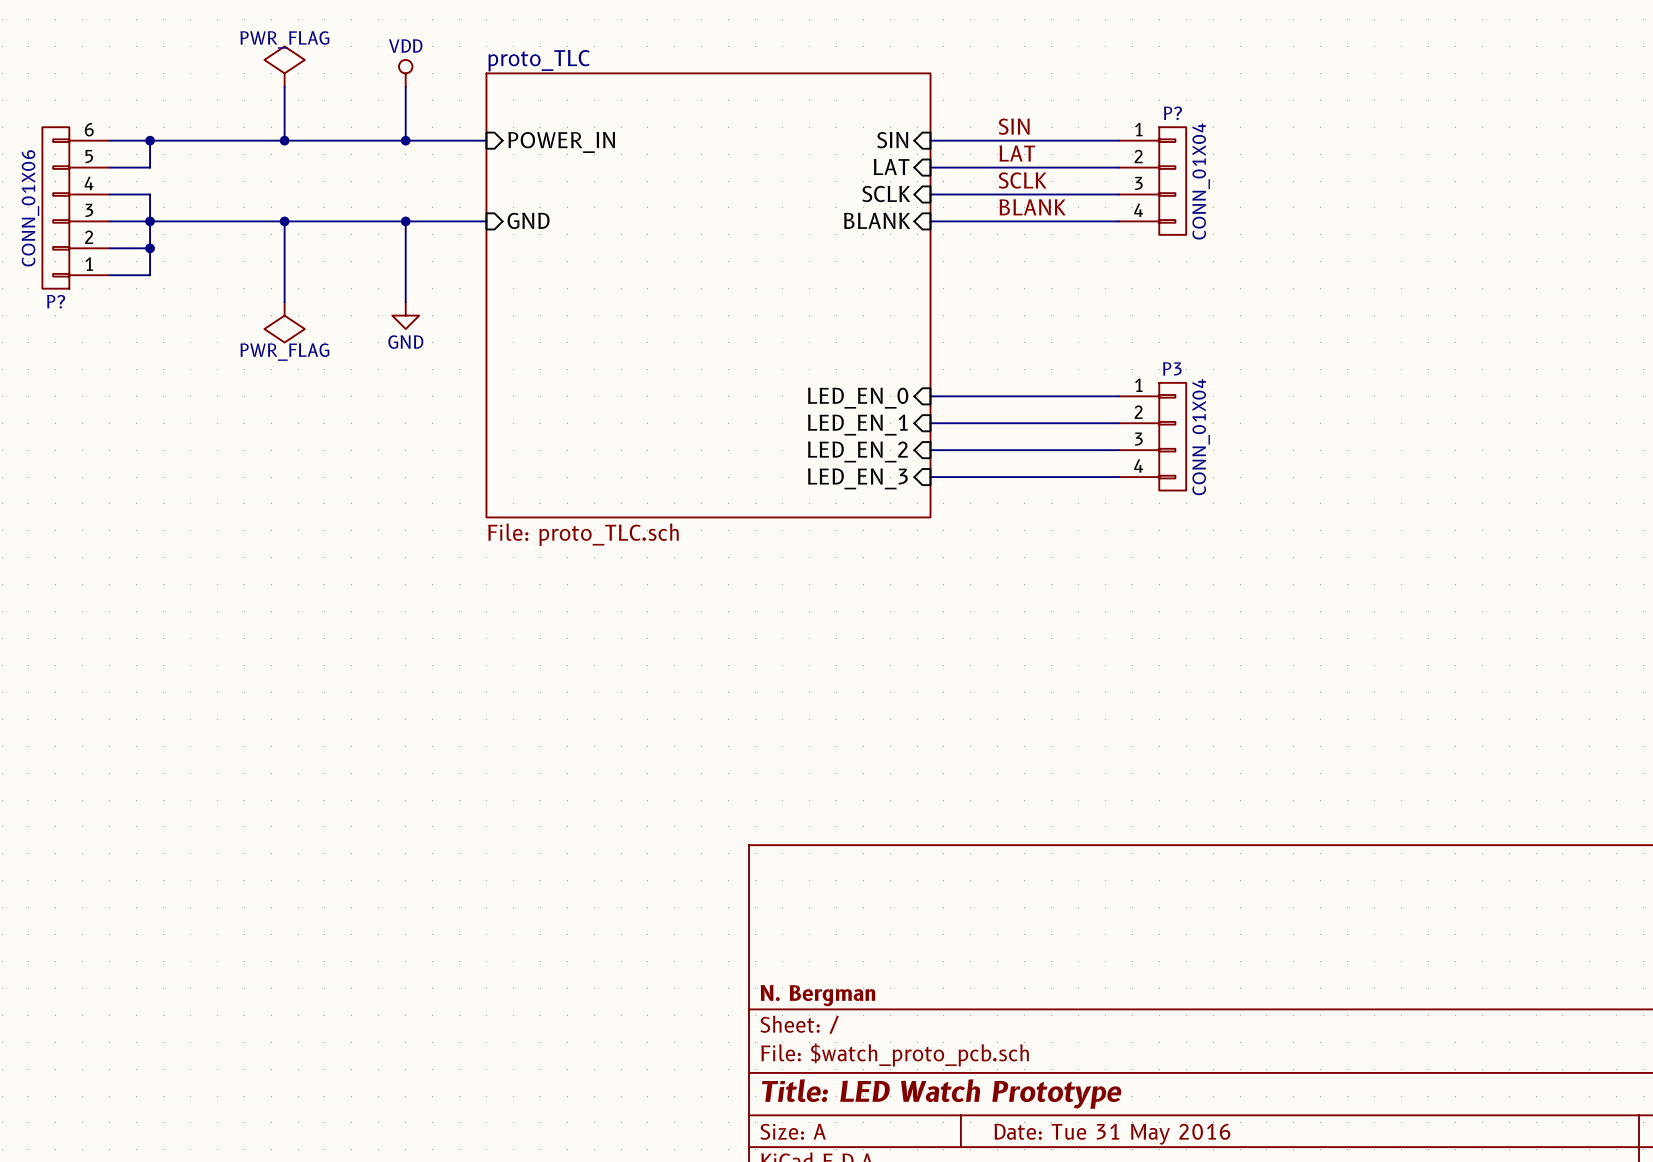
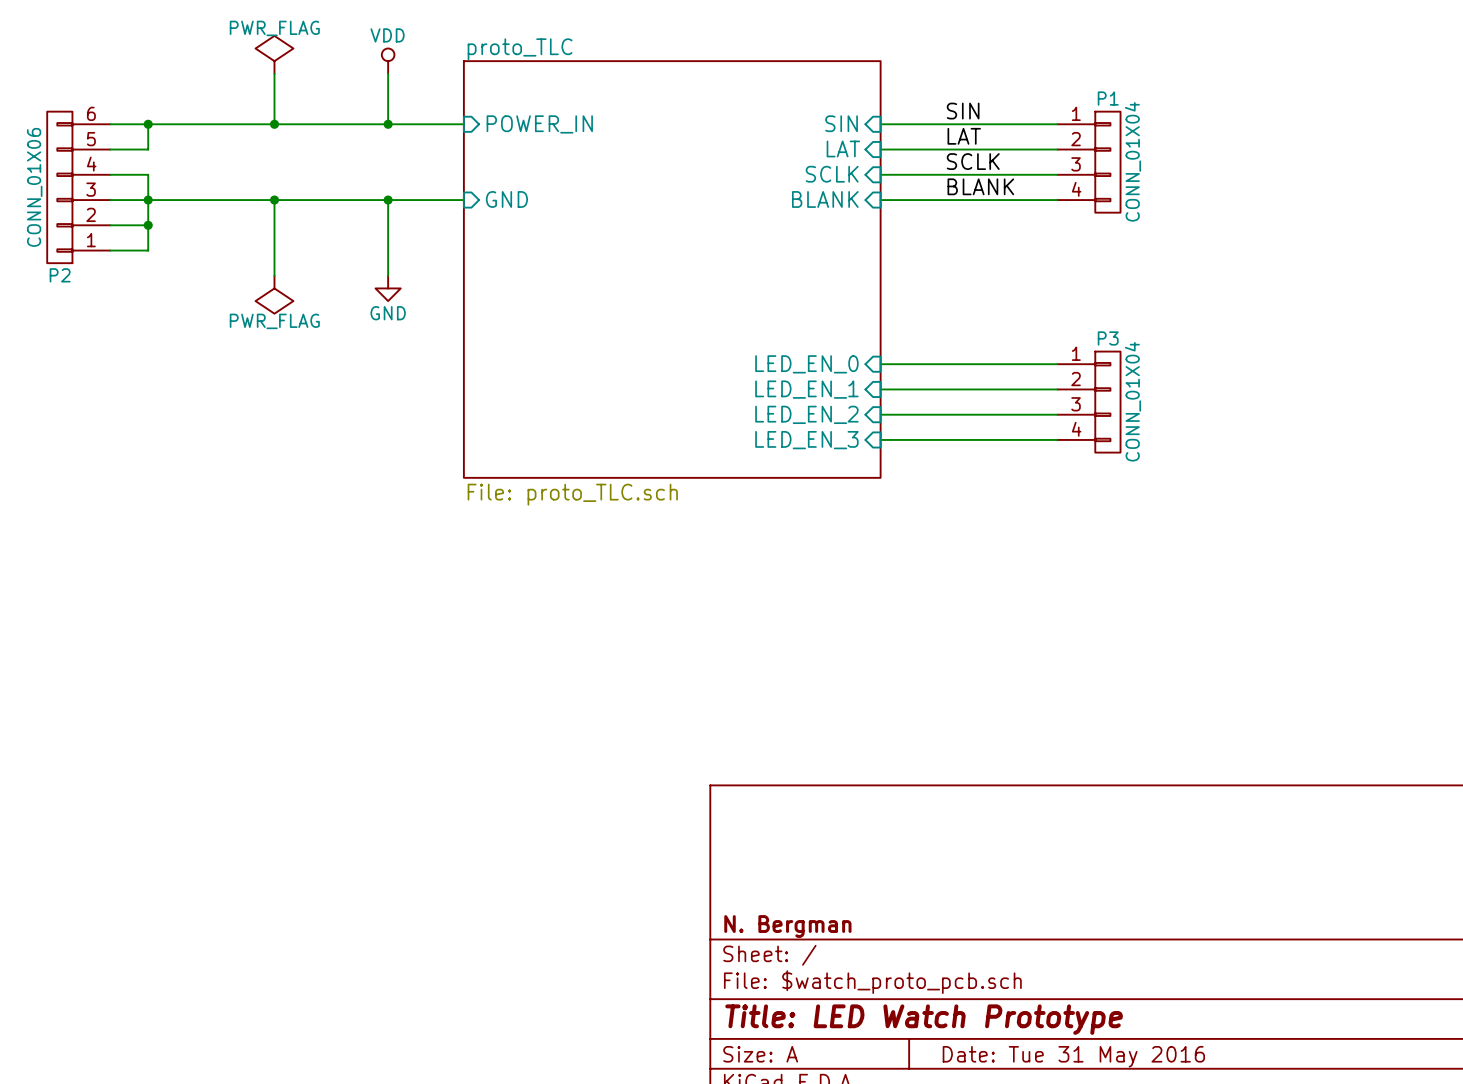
P? name: P? (1172, 113) -> P1 (1108, 98)
P? name: P? (56, 301) -> P2 (60, 275)

